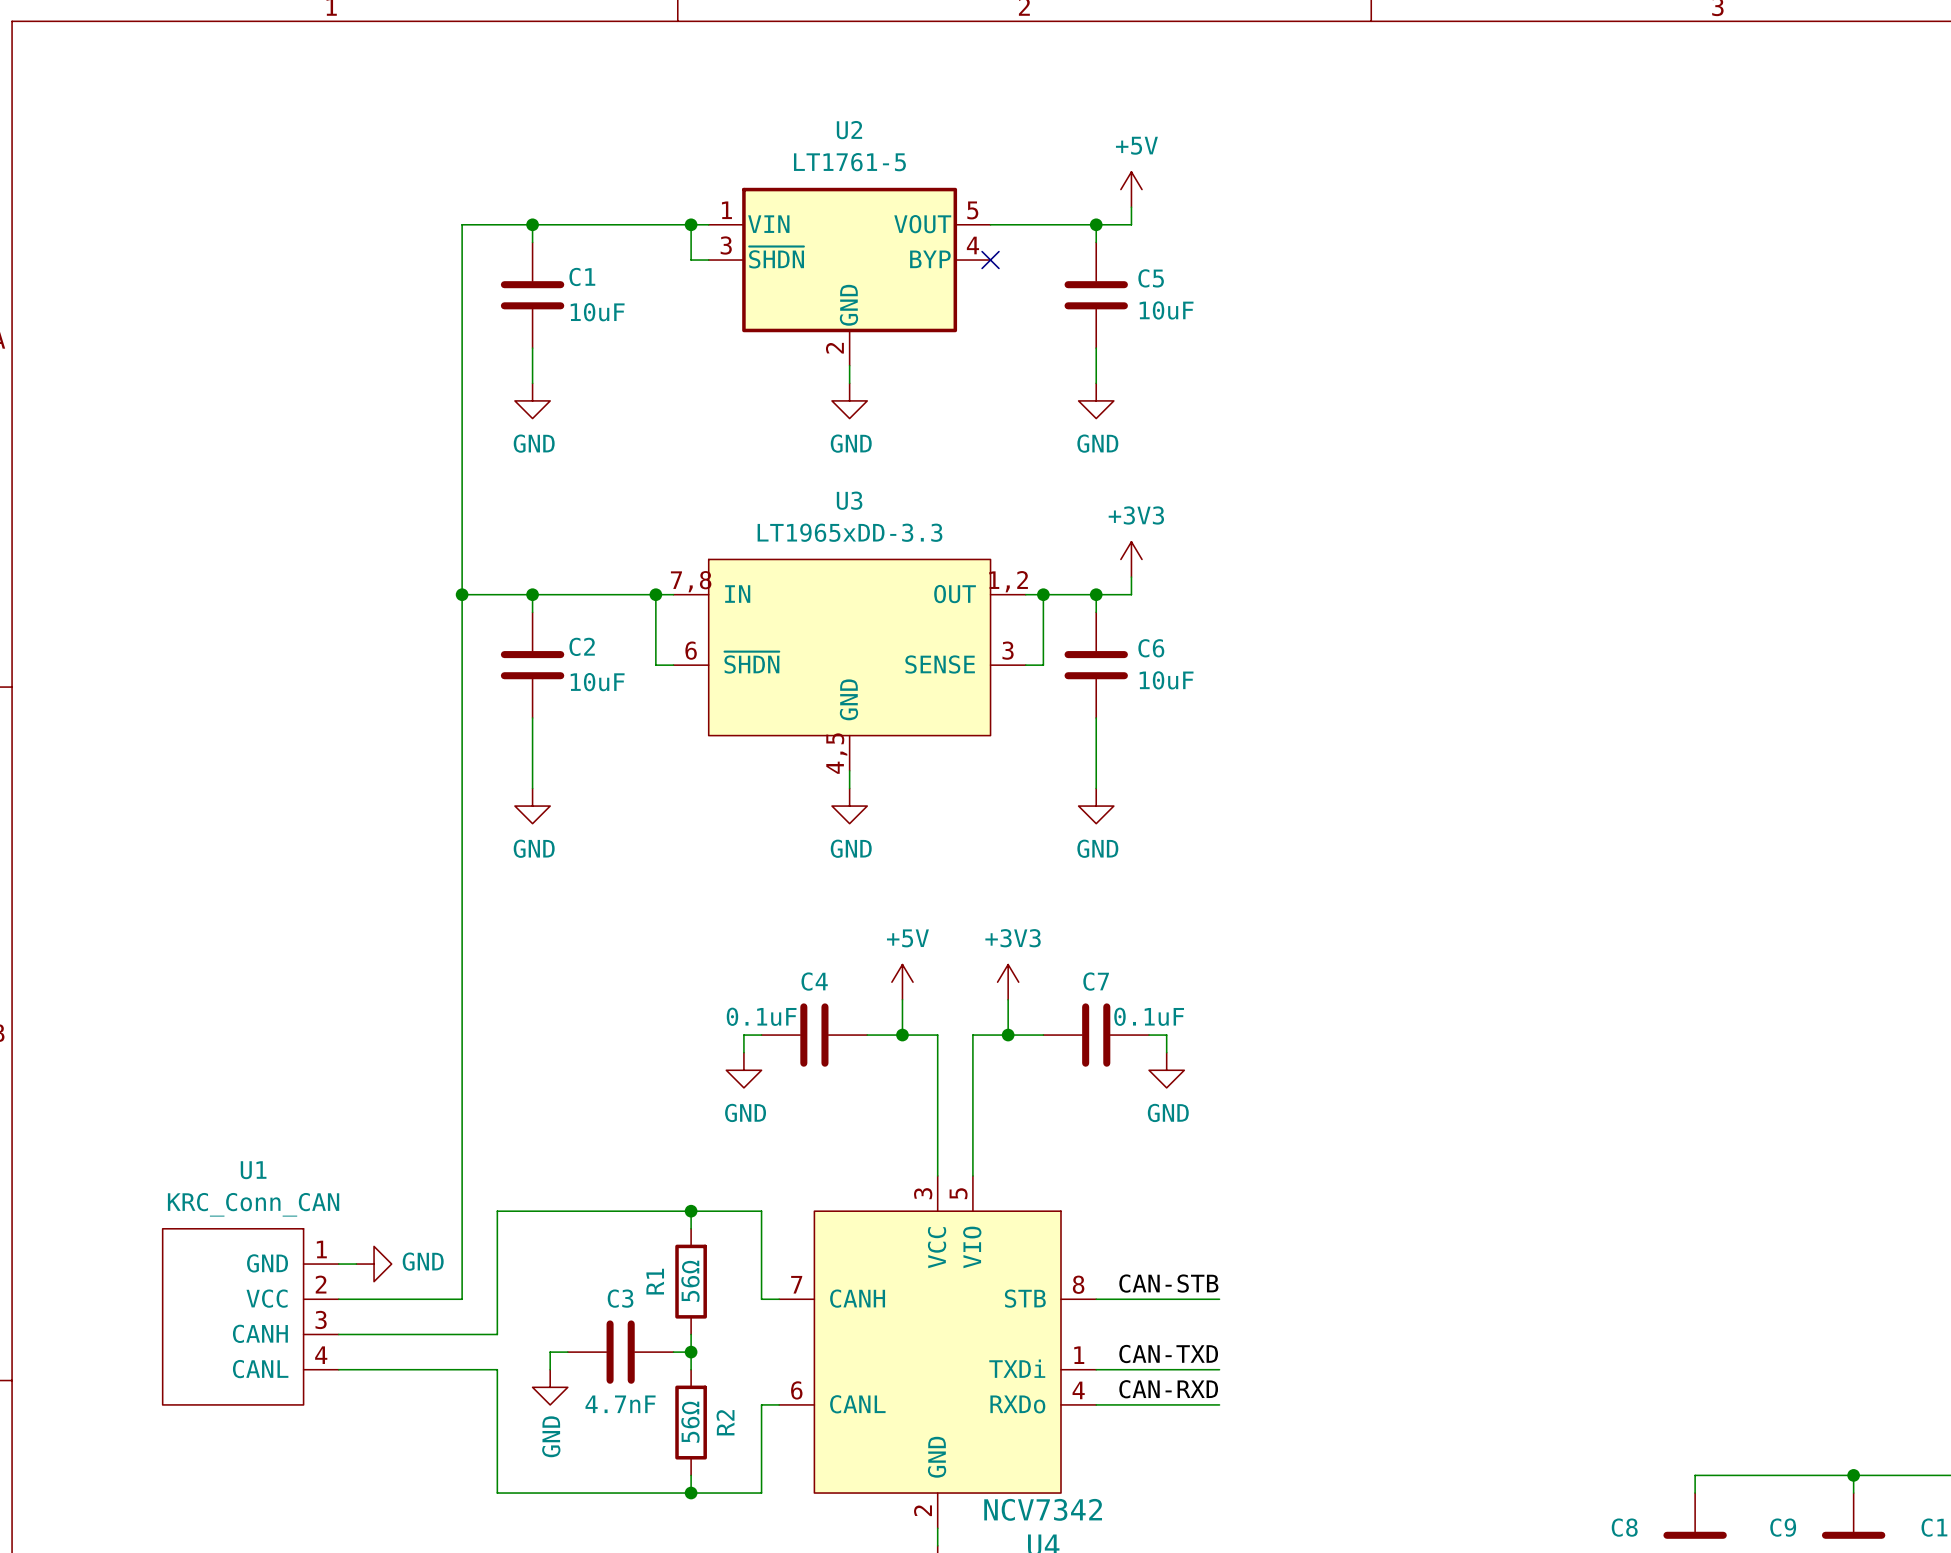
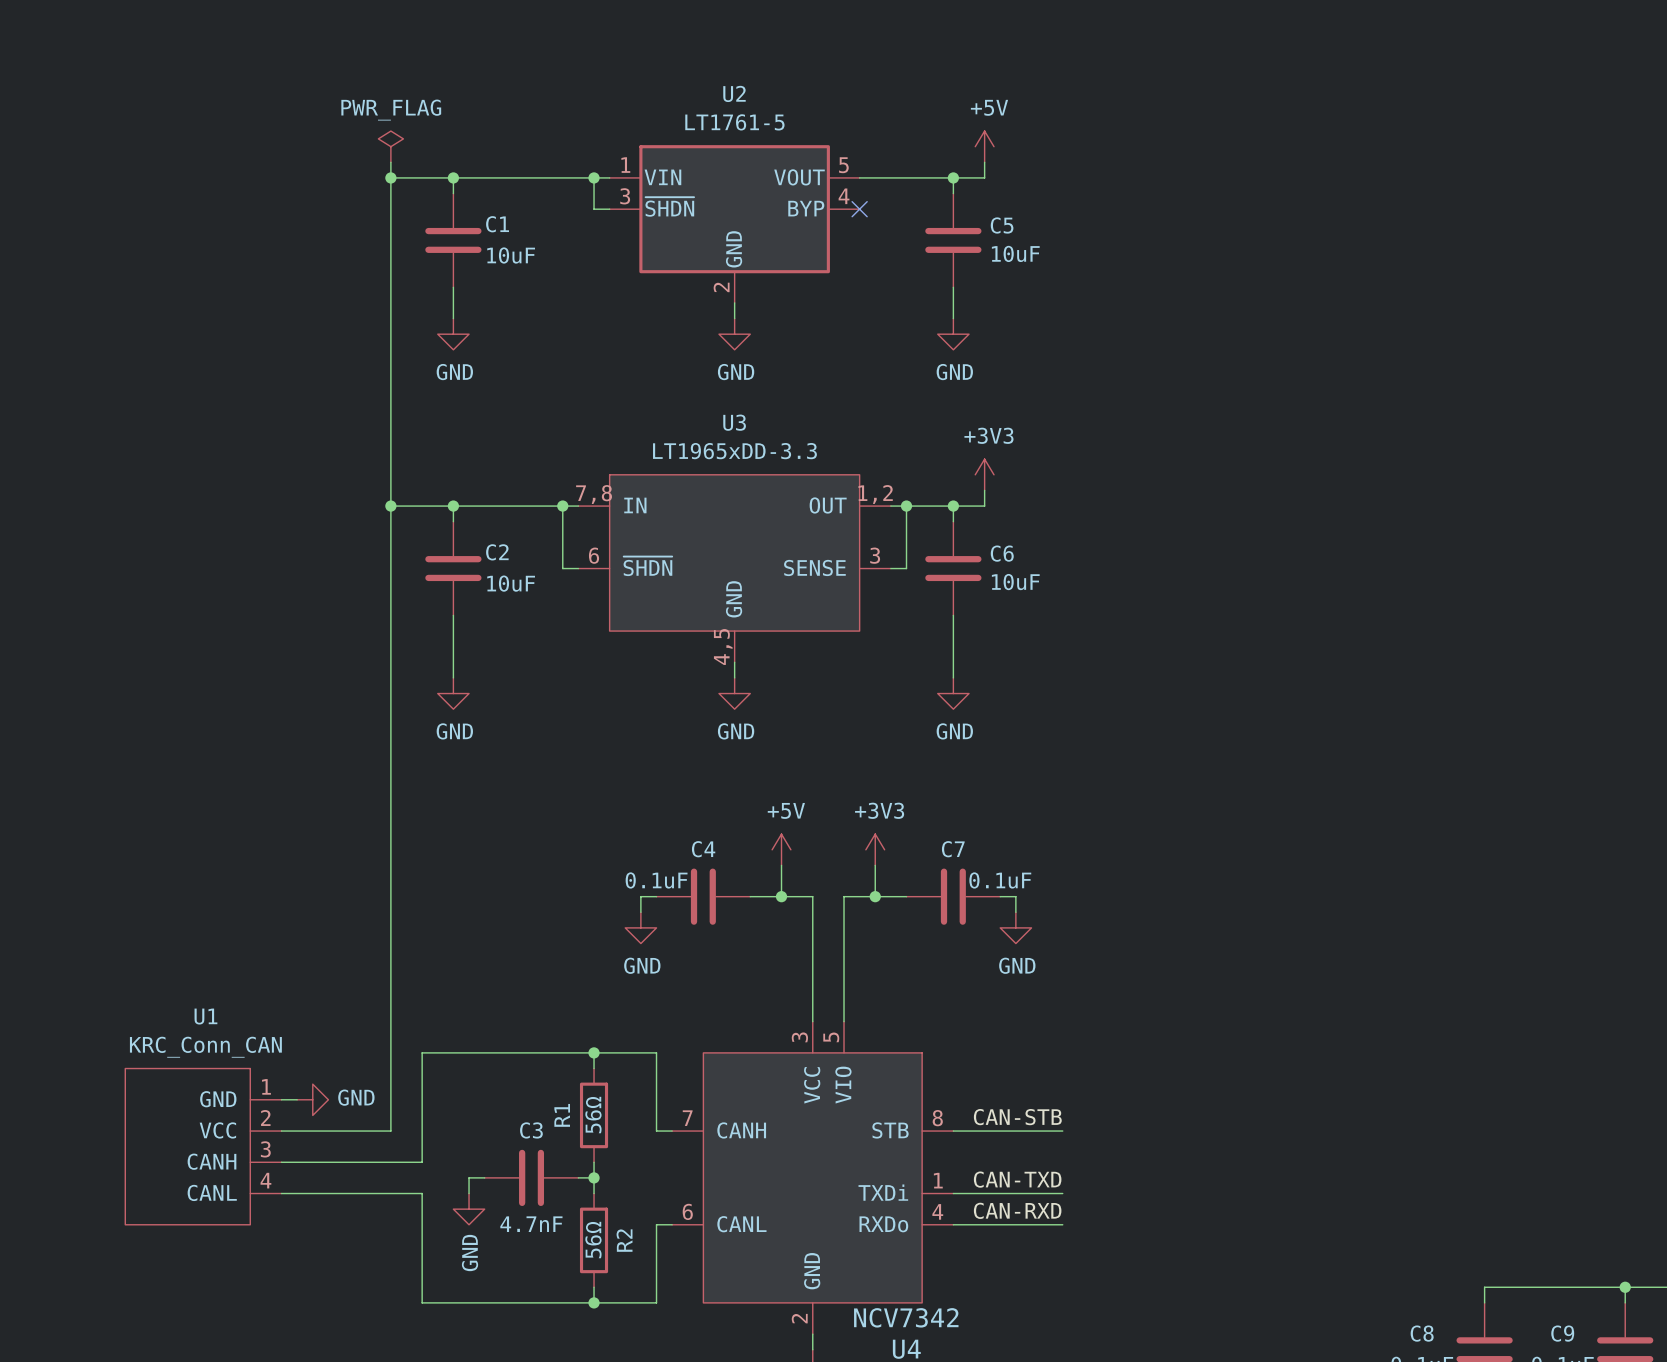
power symbol: none -> PWR_FLAG (390, 146)
wire: none -> (390, 162) (390, 177)
junction: none -> (390, 177)

